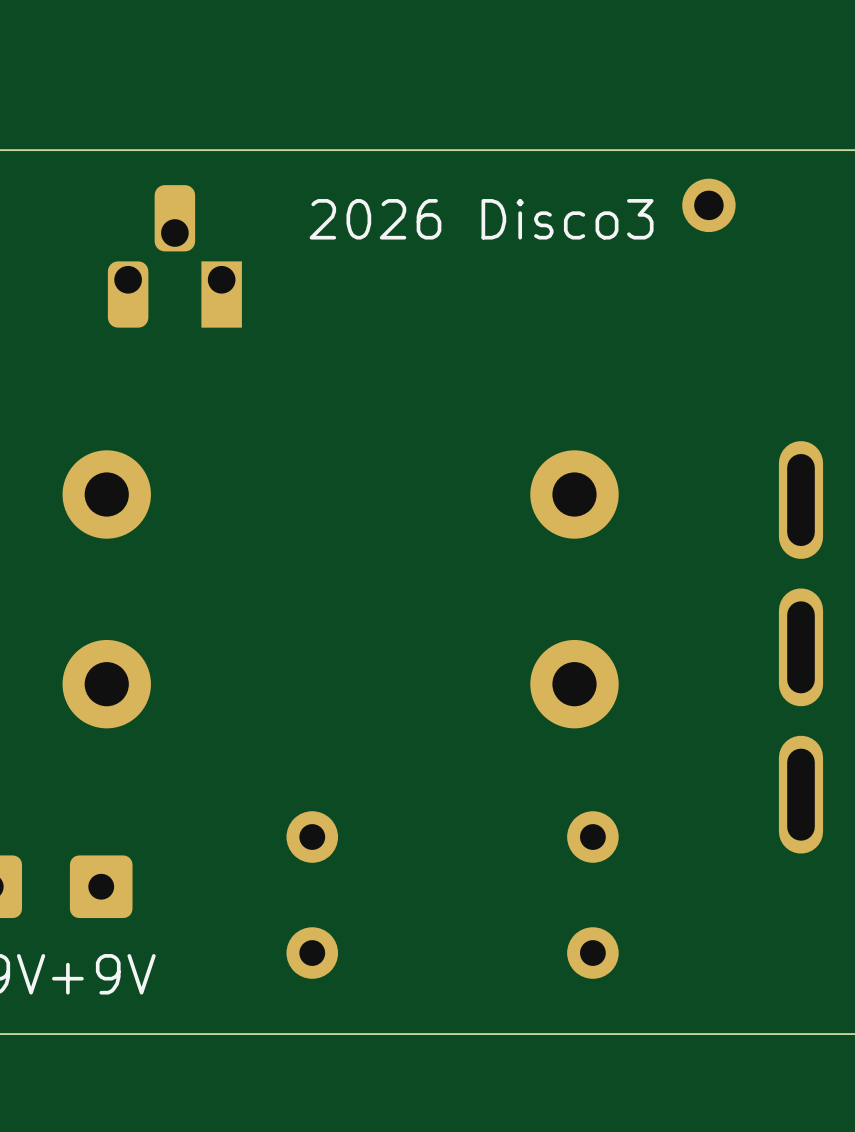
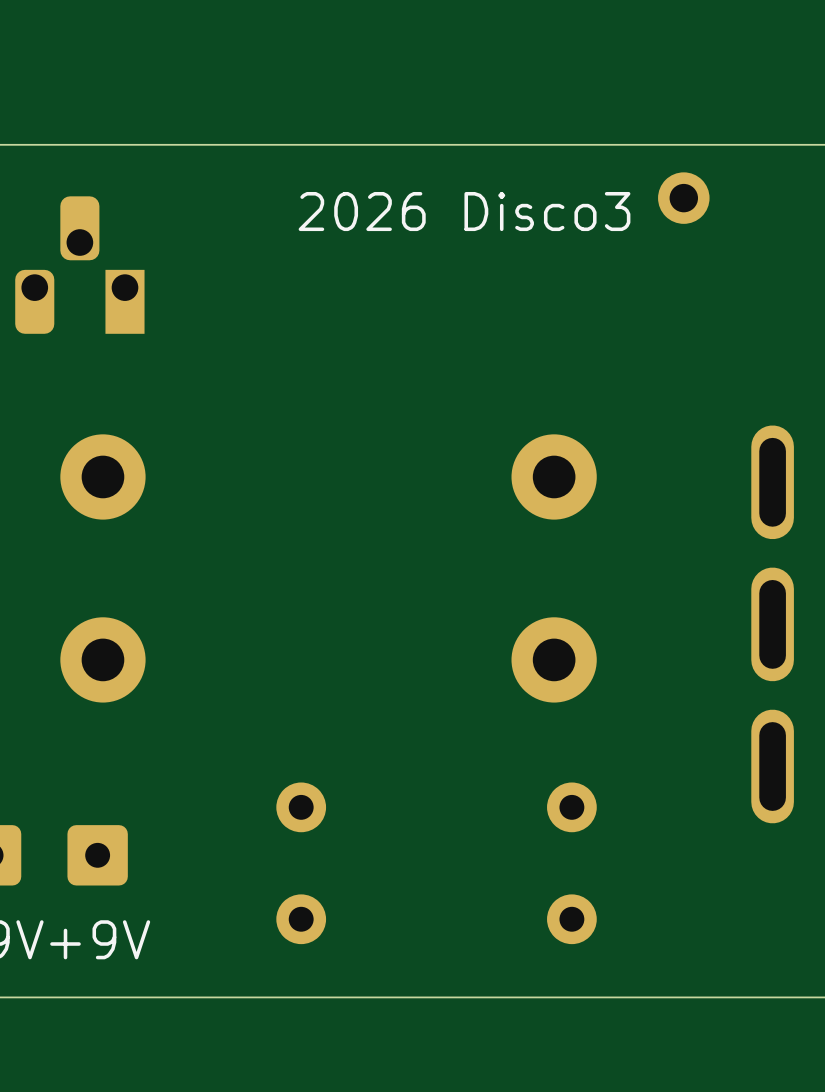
part: (174, 256) -> none
part: none -> (79, 265)

